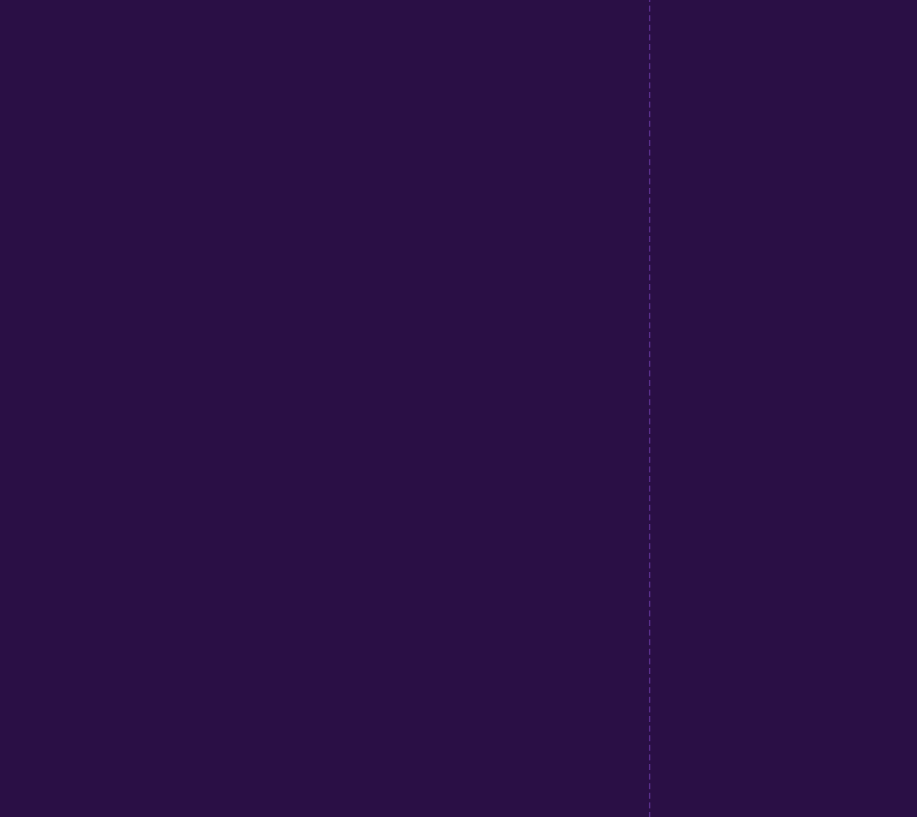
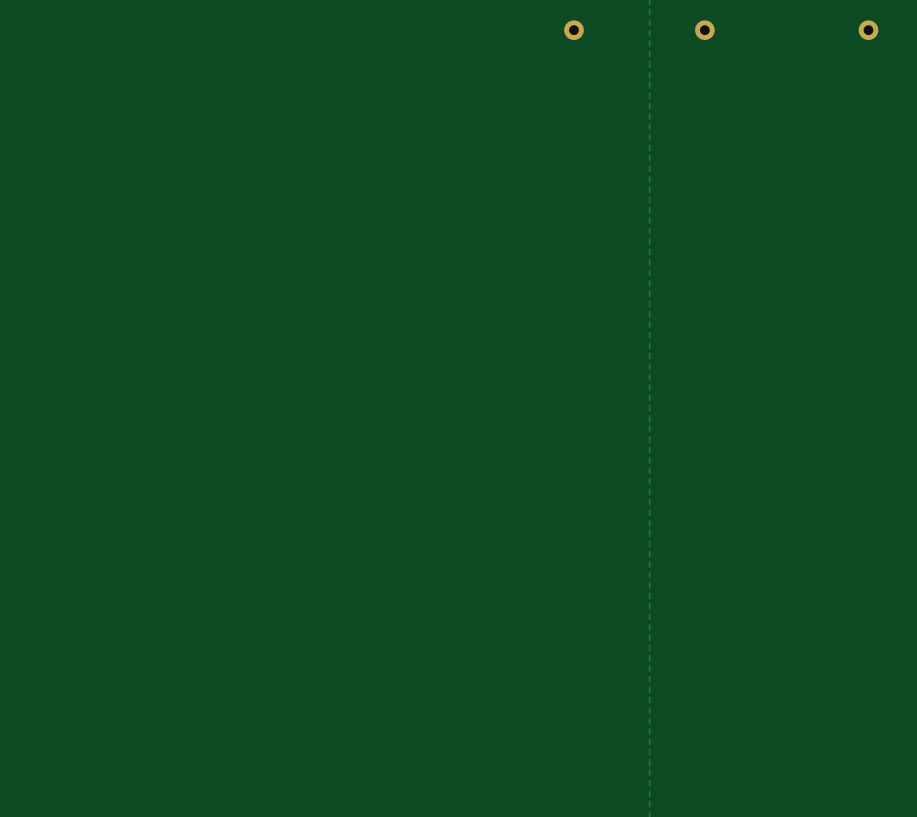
via: none -> (573, 30)
via: none -> (704, 30)
via: none -> (868, 30)

